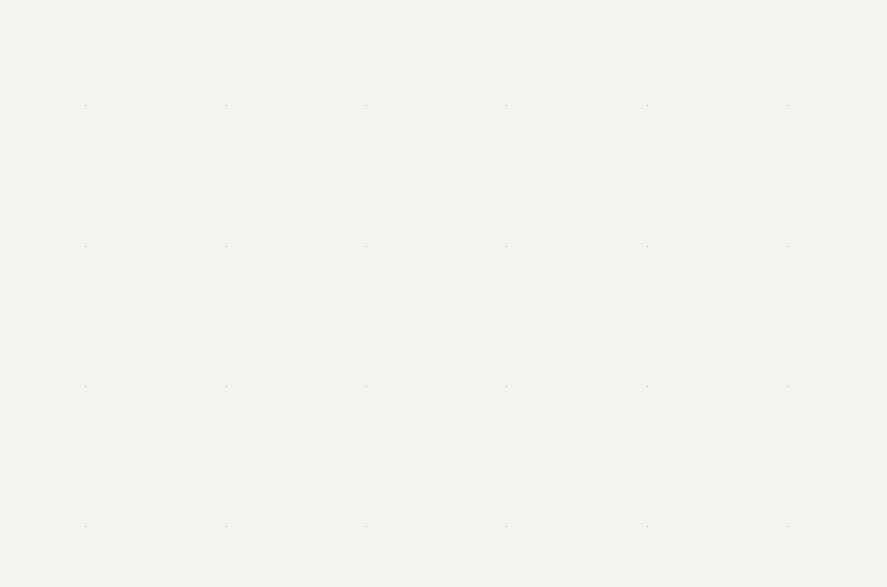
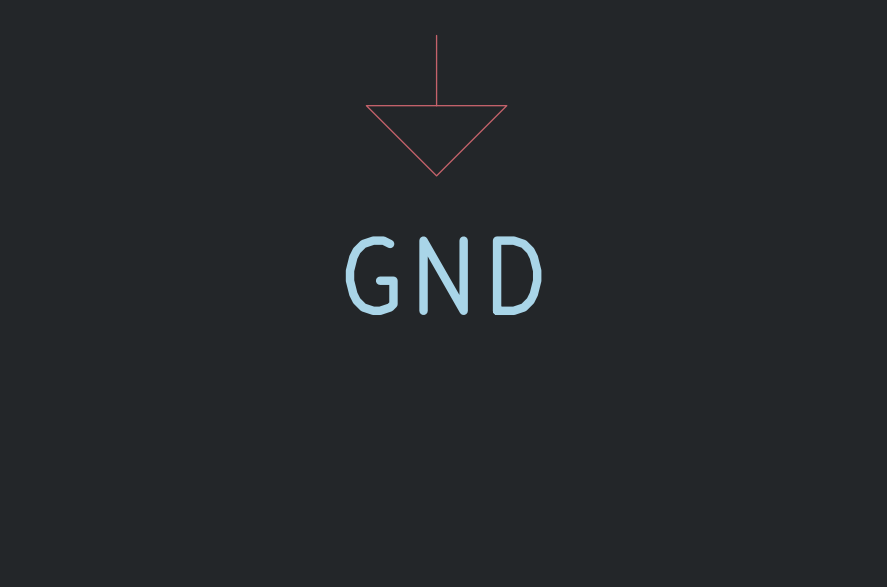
power symbol: none -> GND (436, 105)

